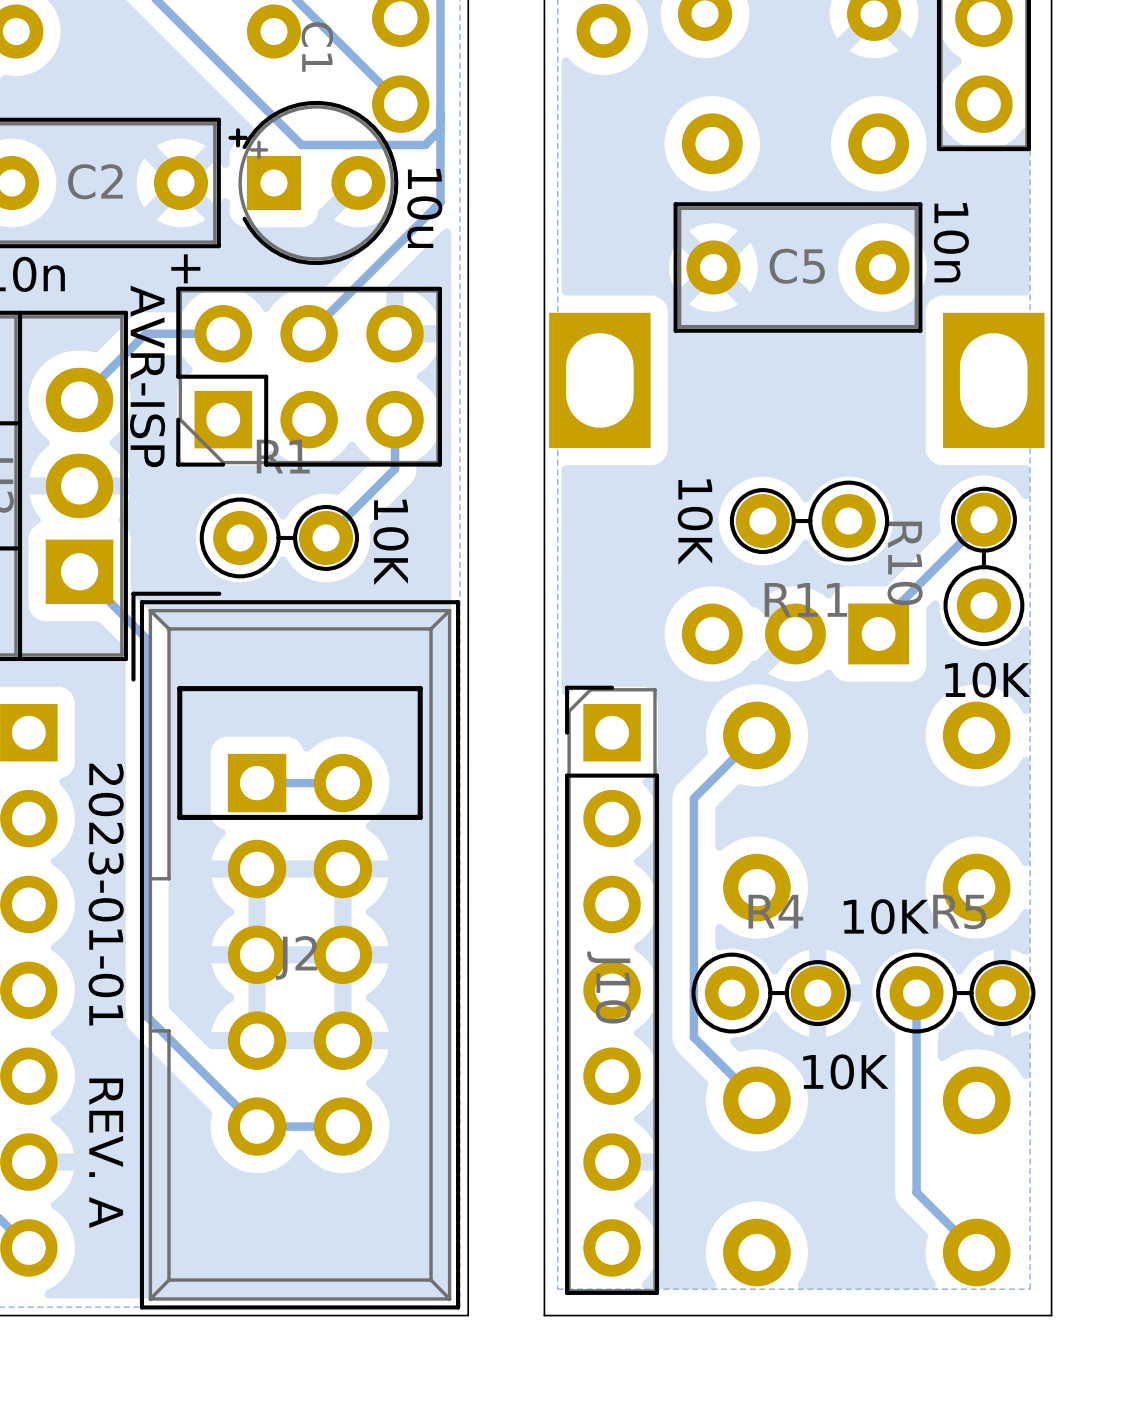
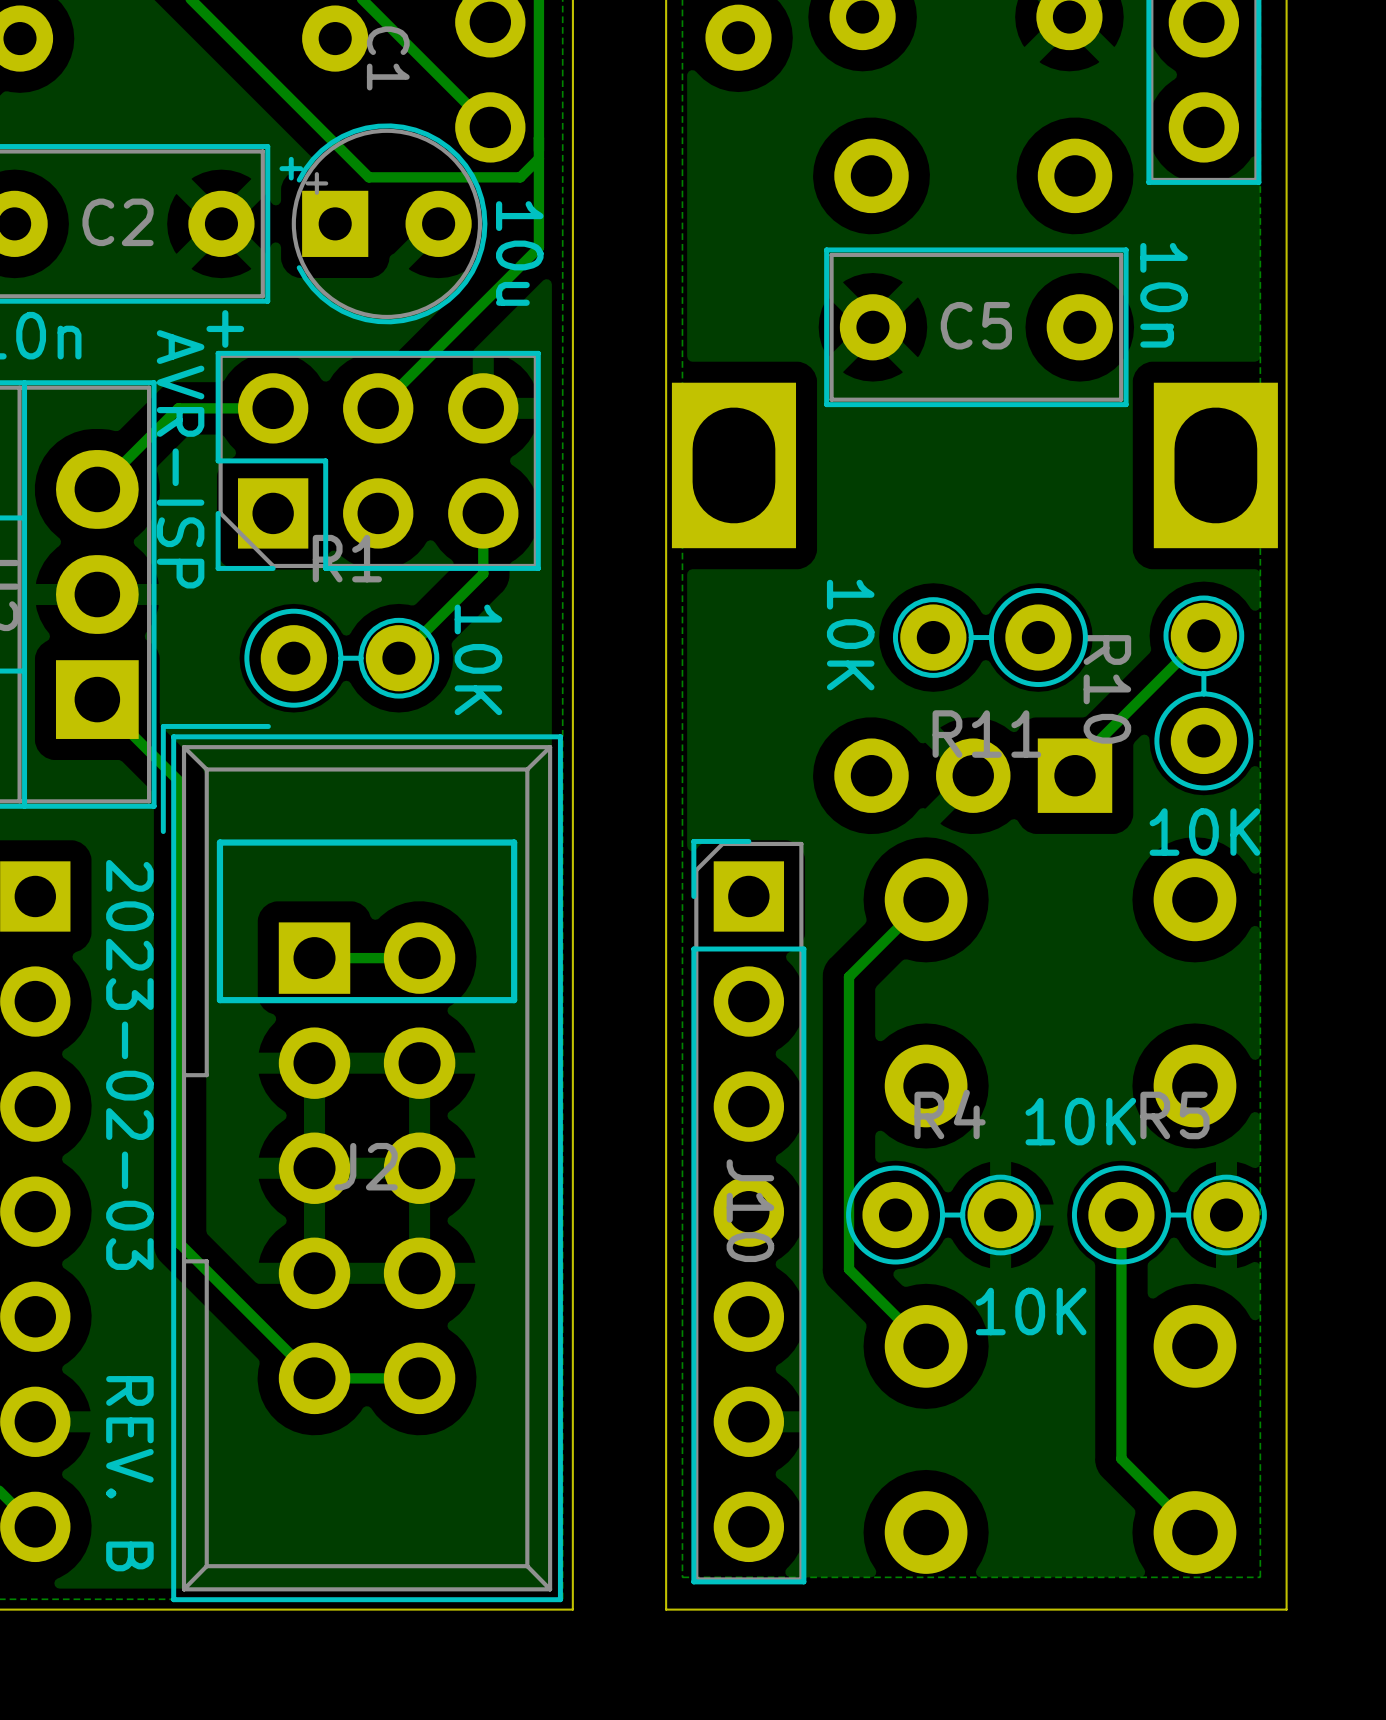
text: 2023-01-01 REV. A (106, 995) -> 2023-02-03 REV. B (129, 1215)

